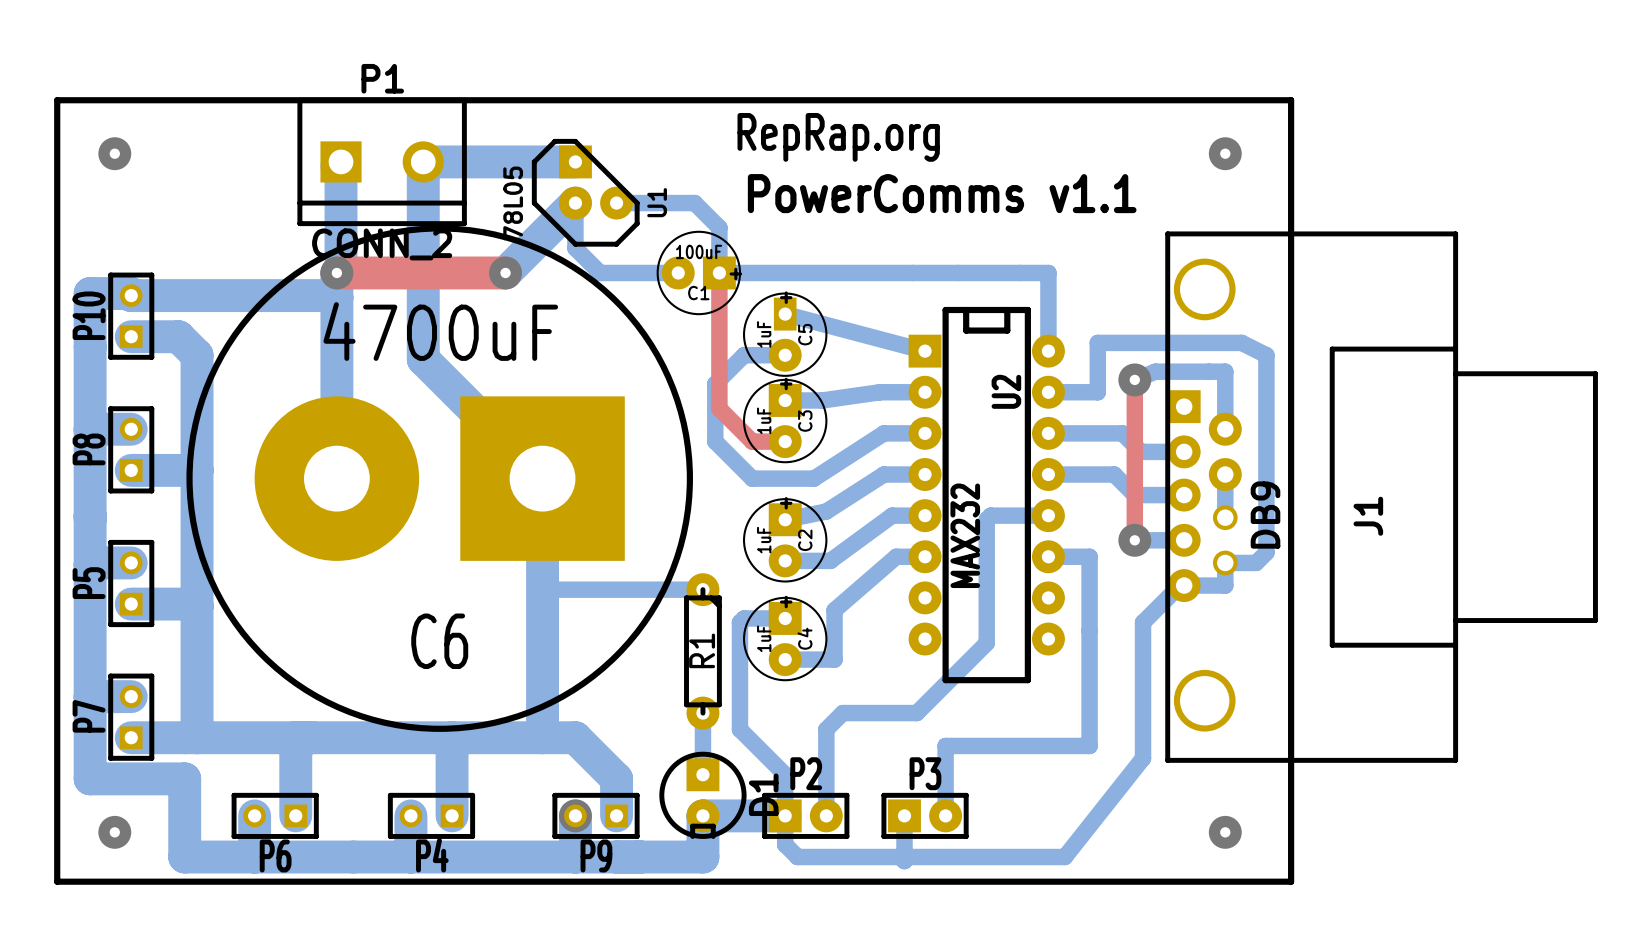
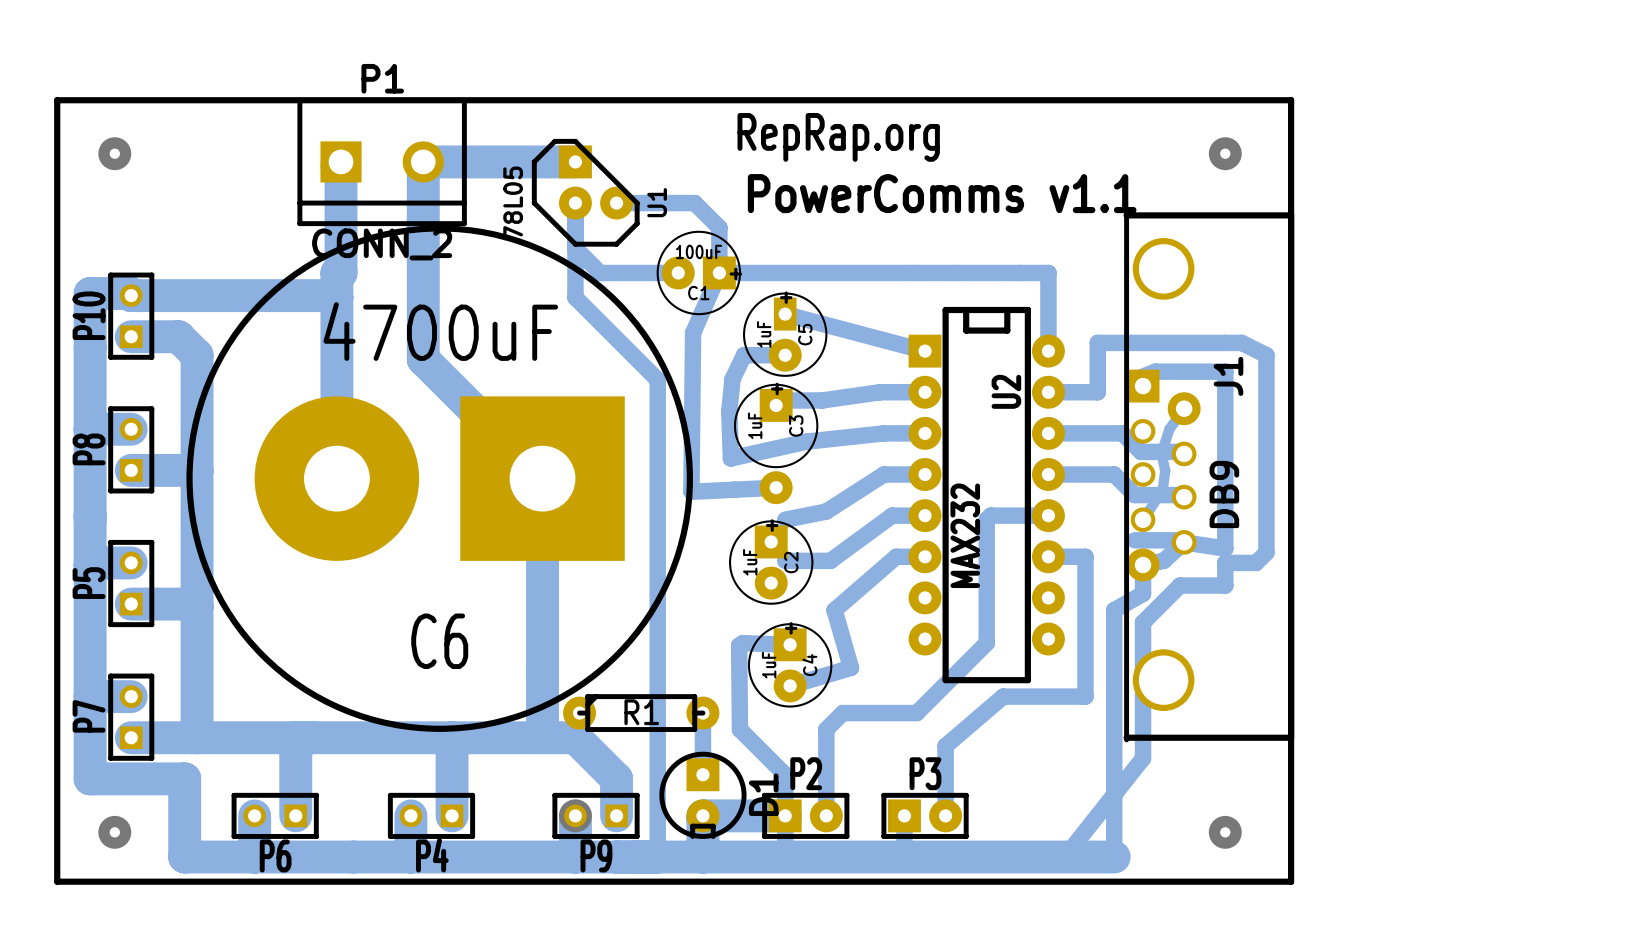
bottom track: (575, 203) (505, 272) -> none
J1 footprint: [1165, 231, 1598, 763] -> [1123, 210, 1295, 743]
bottom track: none -> (575, 248) (575, 297) (657, 379) (657, 857)
top track: (336, 272) (505, 272) -> none
via: (336, 272) -> none
via: (505, 272) -> none
bottom track: none -> (719, 272) (693, 333) (691, 491) (776, 487)
top track: (719, 272) (719, 408) (752, 441) (785, 441) -> none
bottom track: (744, 355) (715, 384) (715, 441) (752, 478) (814, 478) (883, 433) -> (744, 355) (732, 379) (729, 411) (730, 458) (807, 441) (883, 433)
C3 footprint: [743, 378, 828, 464] -> [733, 383, 819, 505]
top track: (1134, 379) (1134, 540) -> none
via: (1134, 379) -> none
bottom track: none -> (1184, 408) (1169, 429) (1161, 453) (1165, 470) (1162, 490) (1143, 519)
bottom track: none -> (1225, 429) (1225, 474)
J1 value position: DB9 (1265, 515) -> DB9 (1224, 494)
J1 name position: J1 (1368, 516) -> J1 (1228, 376)
bottom track: none -> (1225, 517) (1225, 548) (1184, 542) (1163, 560) (1143, 565) (1143, 593) (1114, 610) (1114, 857) (702, 857)
C2 position: (785, 540) -> (771, 562)
via: (1134, 540) -> none
bottom track: (1085, 556) (1089, 556) (1089, 745) (945, 745) -> (1085, 556) (1085, 696) (1003, 696) (945, 745)
bottom track: (542, 589) (702, 589) -> none
bottom track: (834, 610) (834, 659) (785, 659) -> (834, 610) (851, 667) (790, 685)
bottom track: (785, 618) (744, 618) (739, 622) (739, 729) -> (790, 644) (742, 643) (739, 645) (739, 729)
C4 position: (785, 639) -> (790, 665)
R1 rotation: 0° (702, 651) -> 90° counterclockwise (641, 713)

